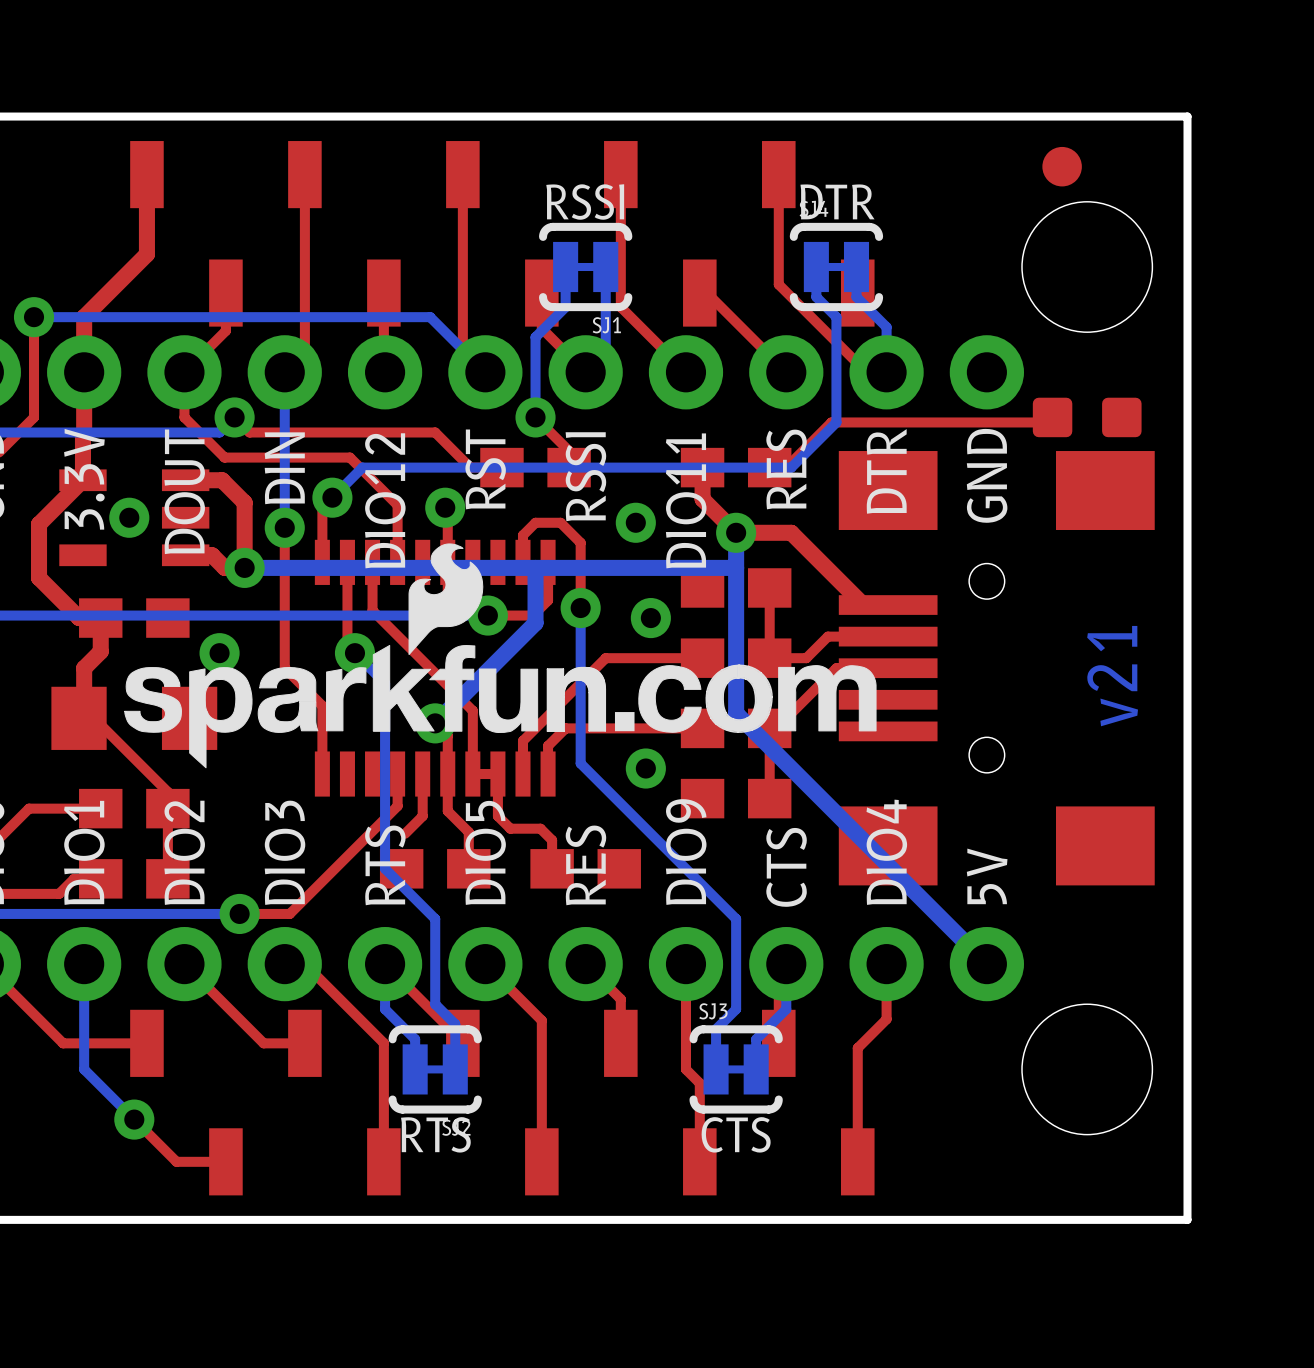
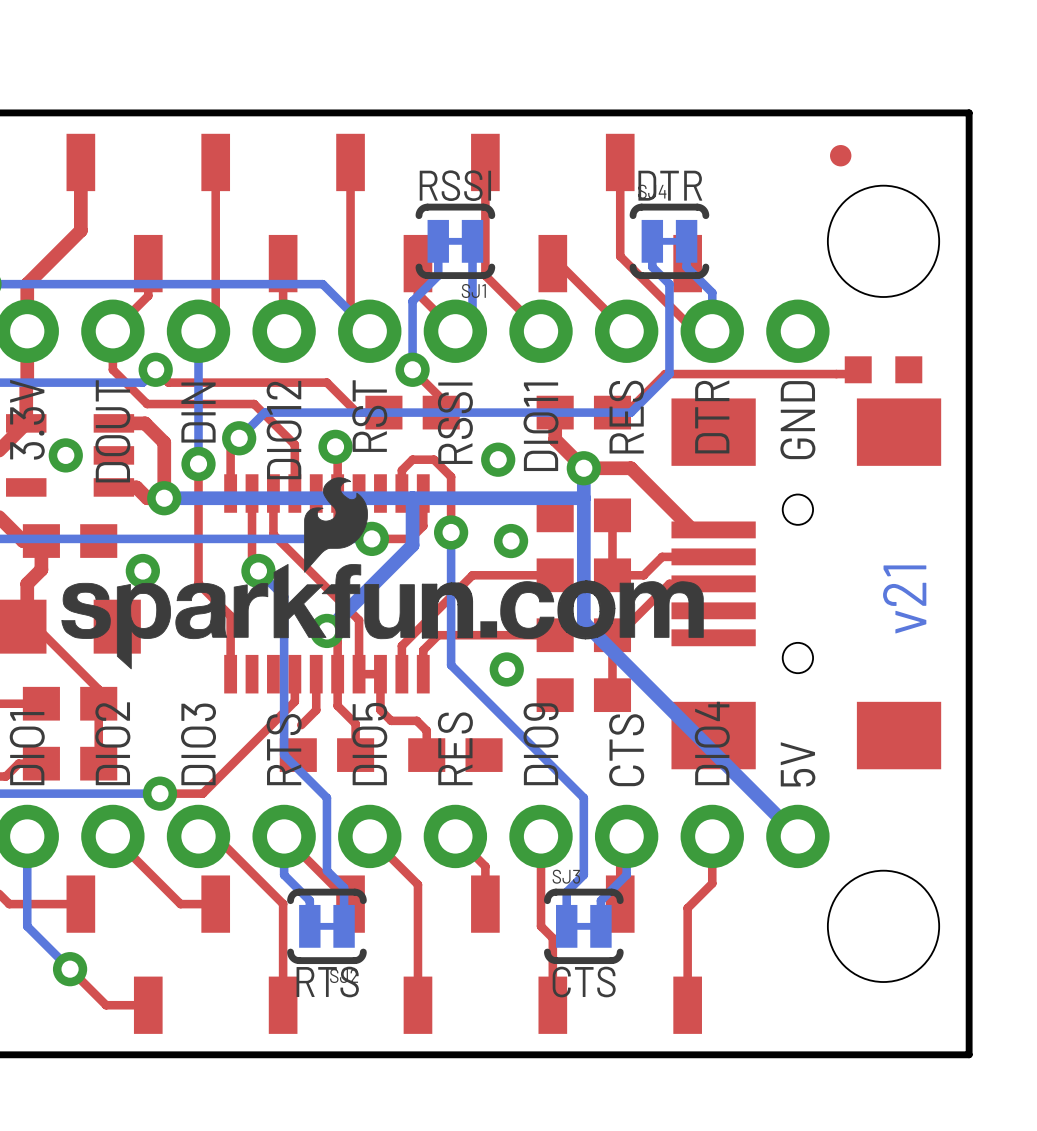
part footprint: [1042, 146, 1082, 187] -> [830, 145, 852, 167]
part footprint: [1032, 397, 1142, 438] -> [844, 356, 923, 384]

